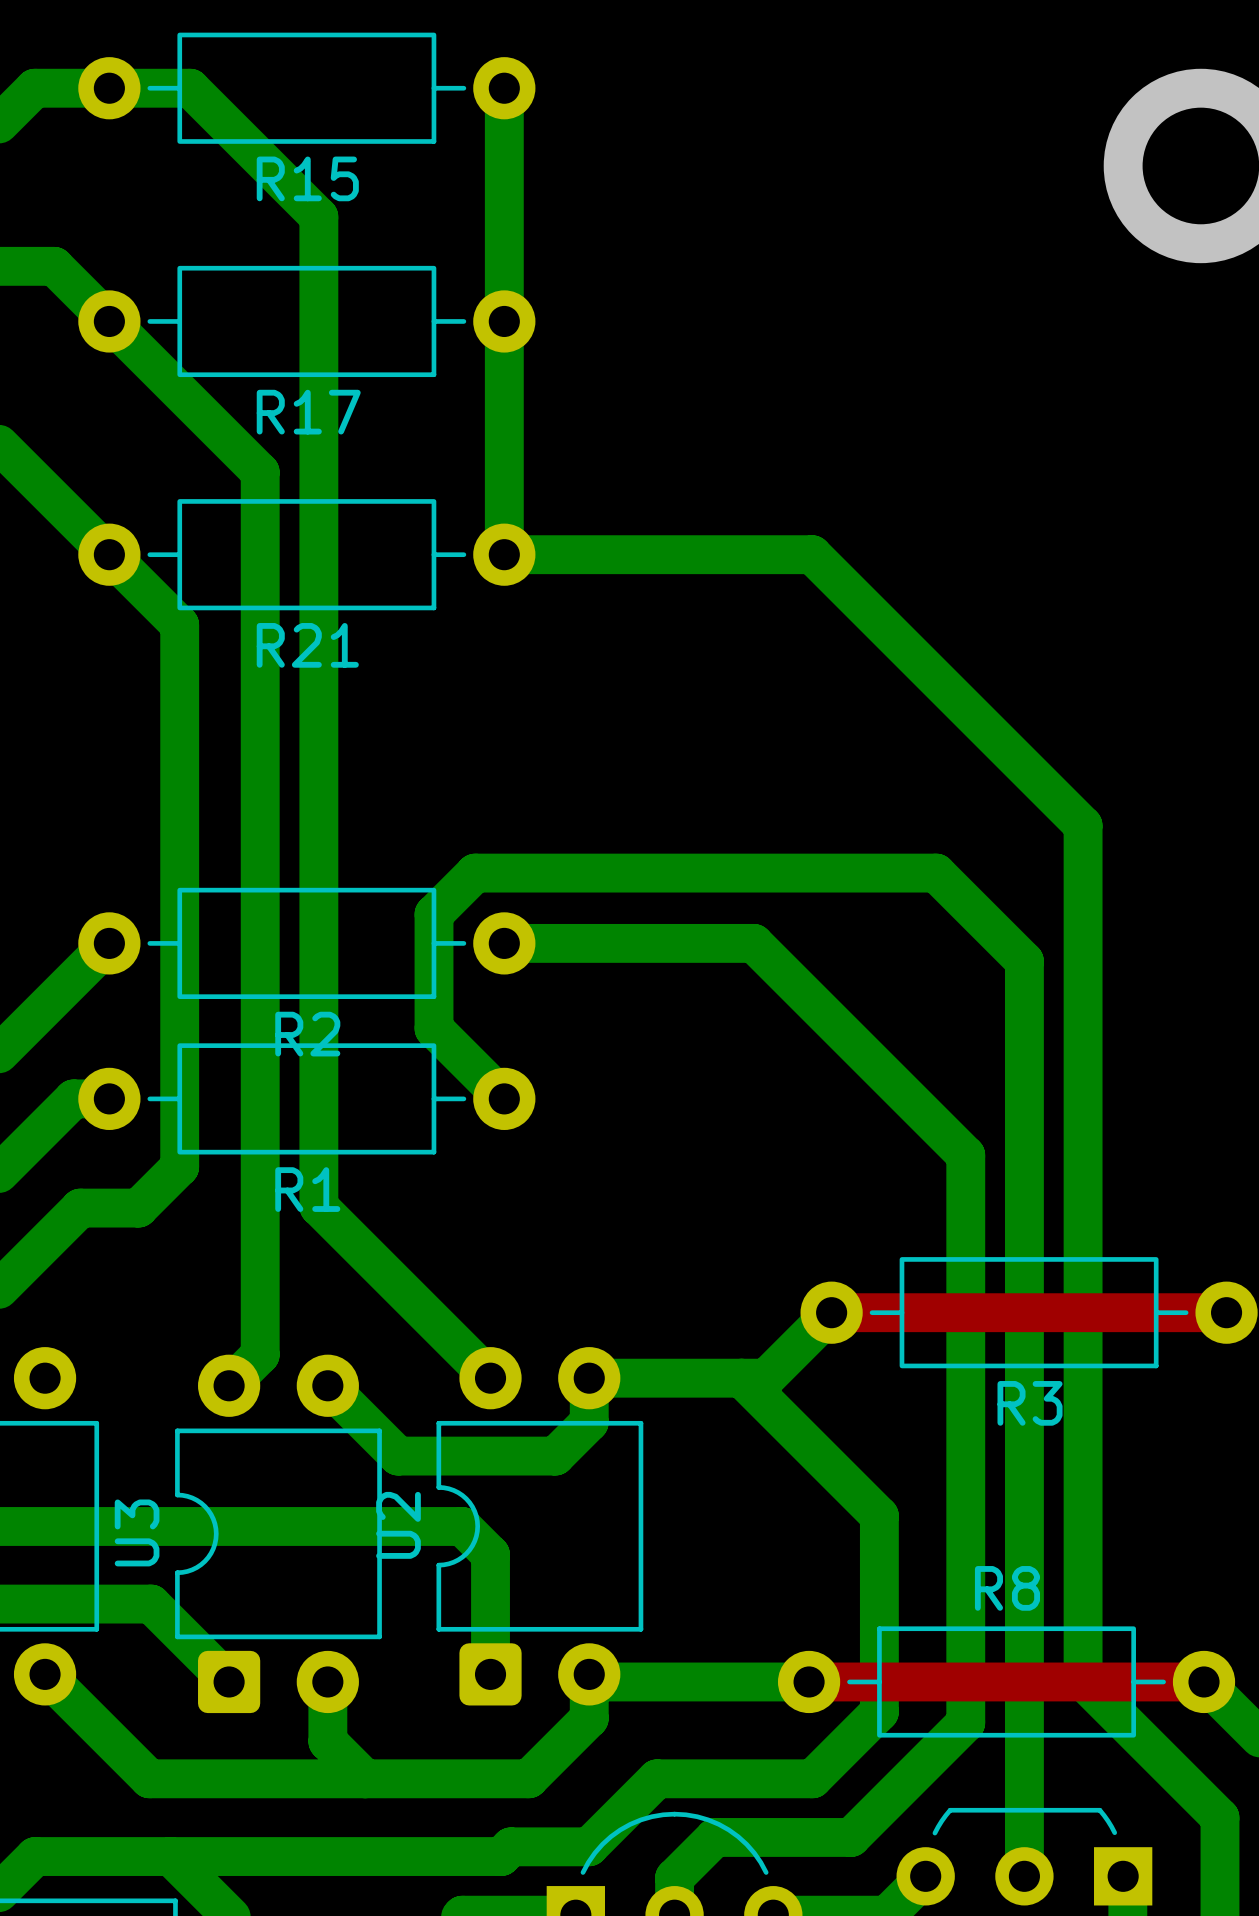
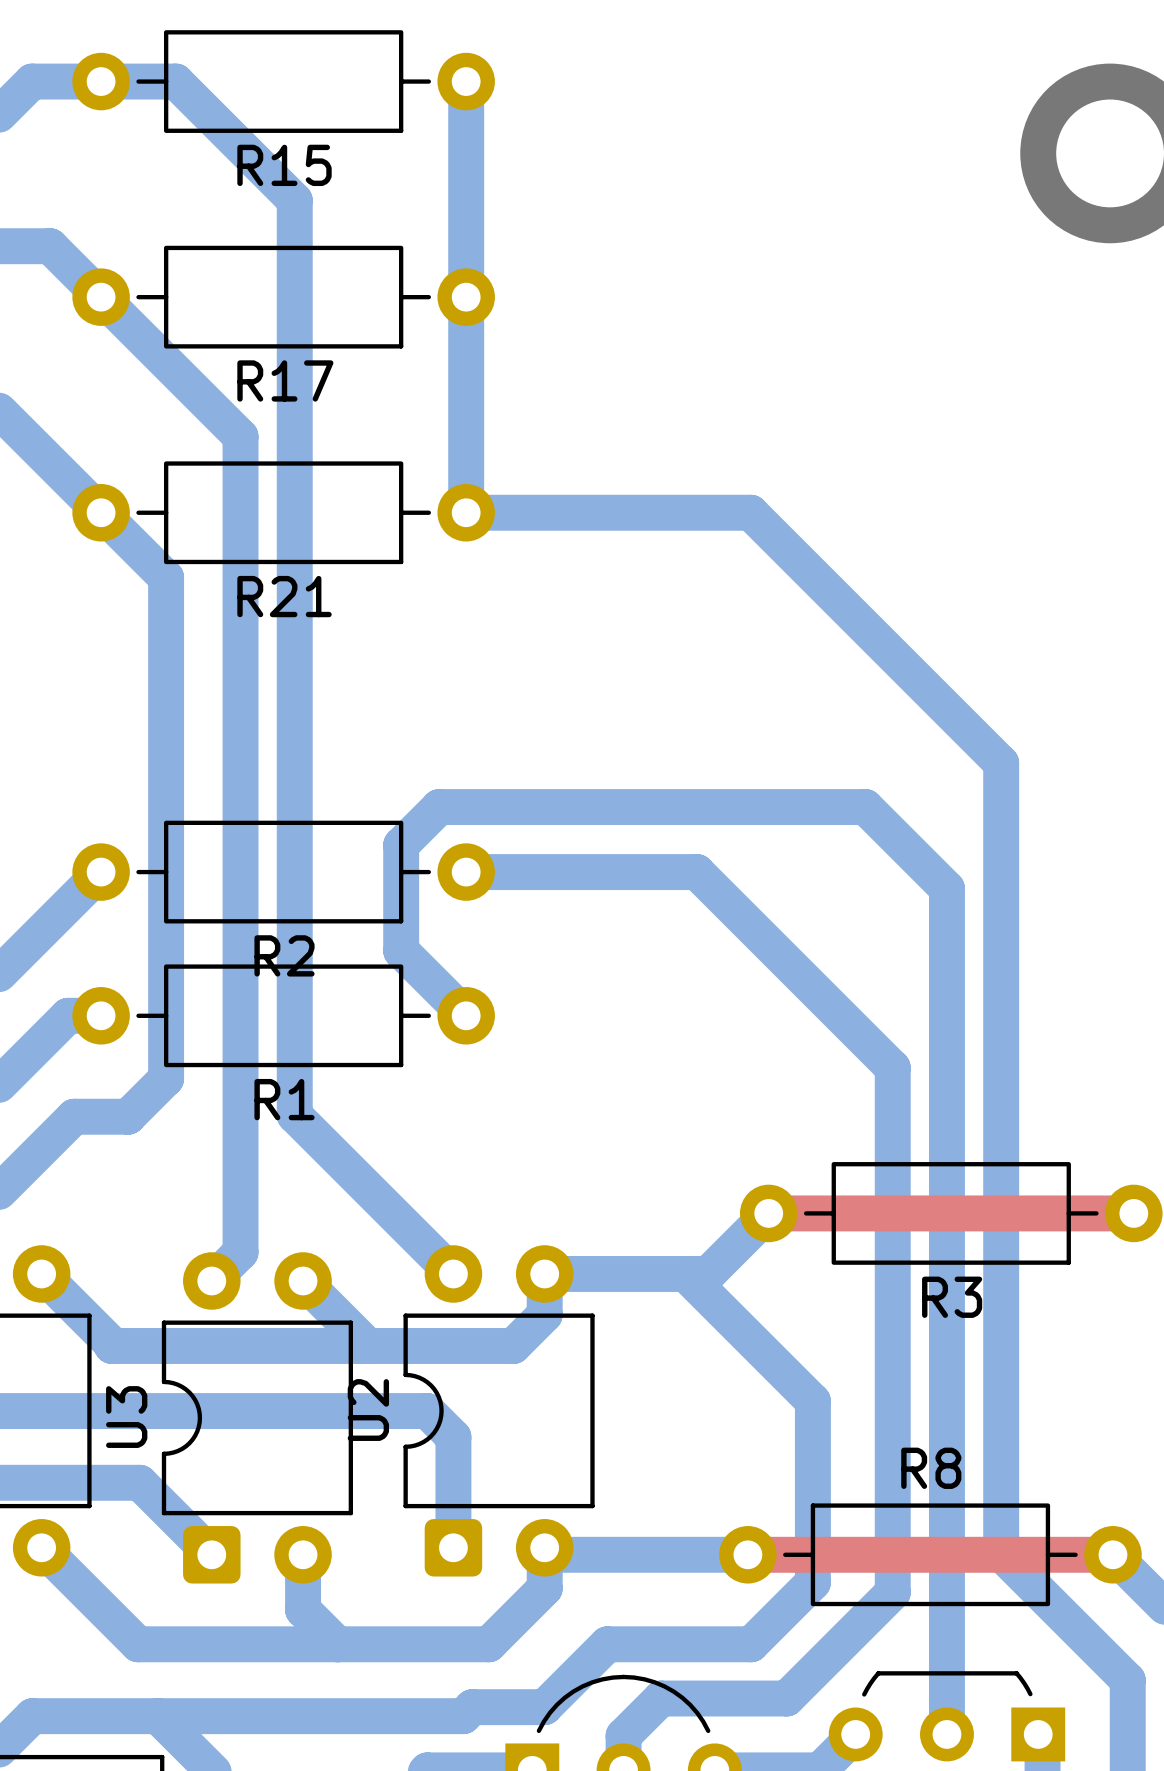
bottom track: none -> (41, 1273) (111, 1345) (368, 1345)

